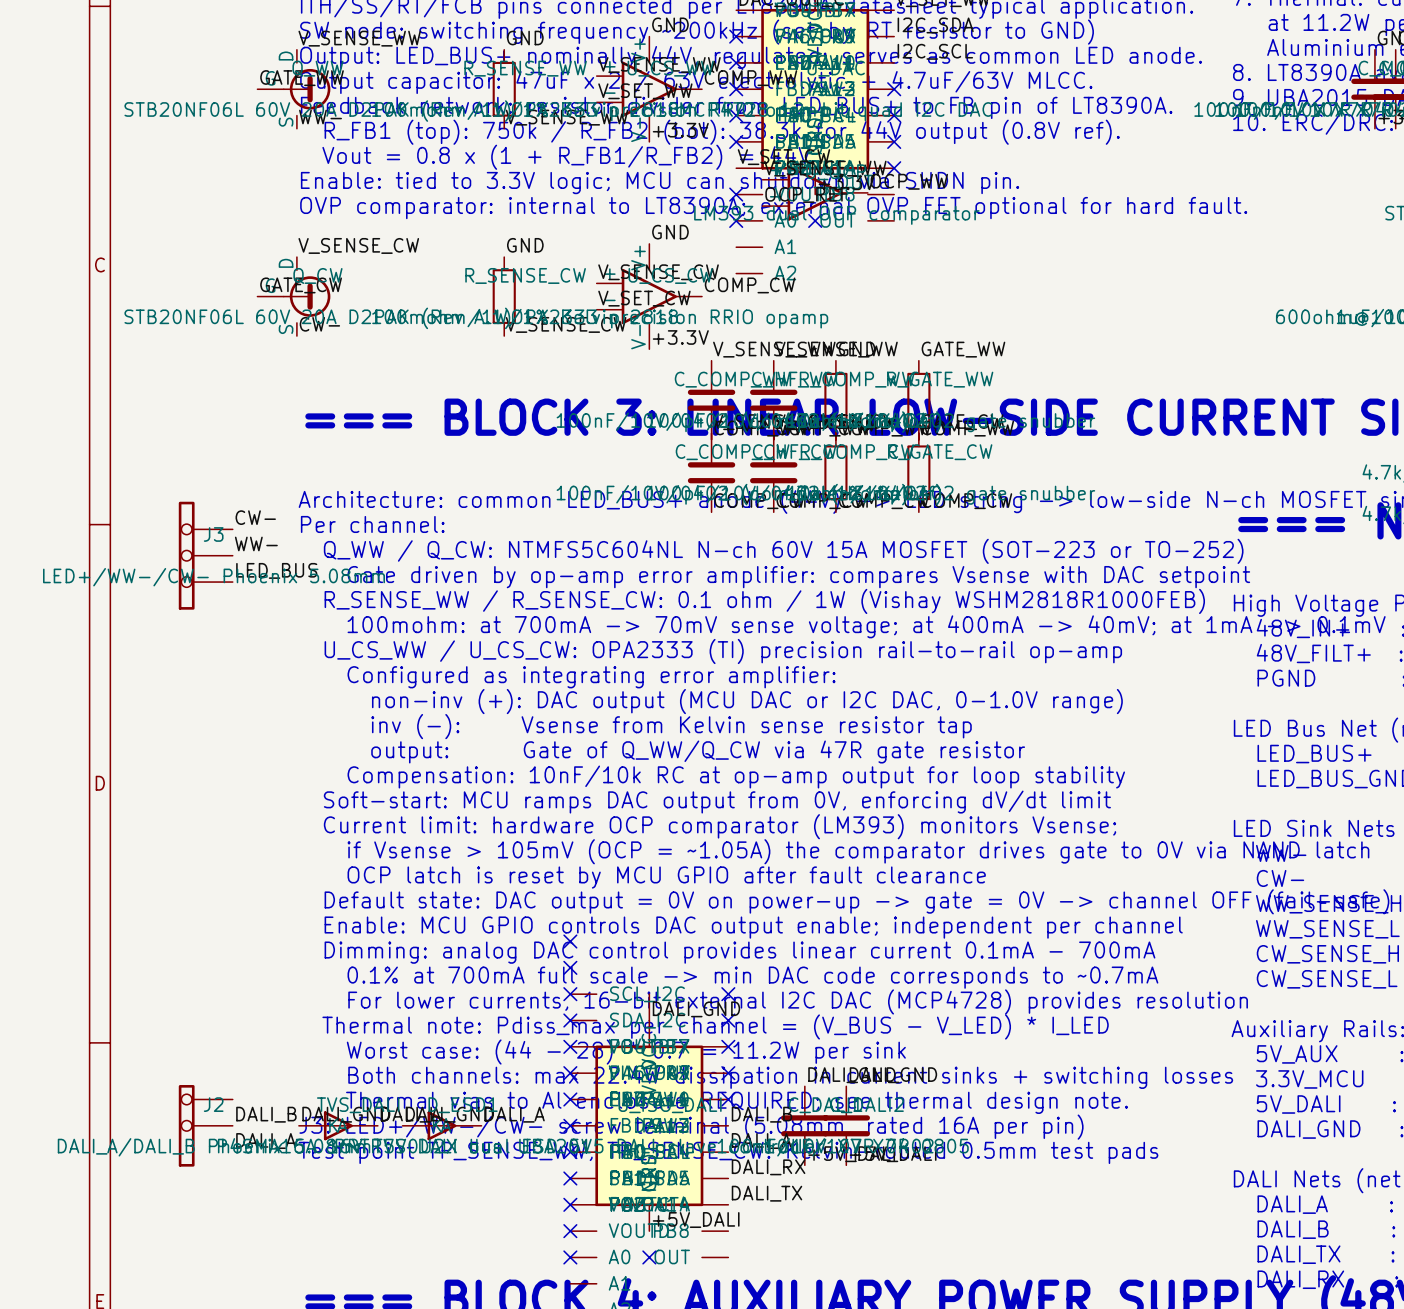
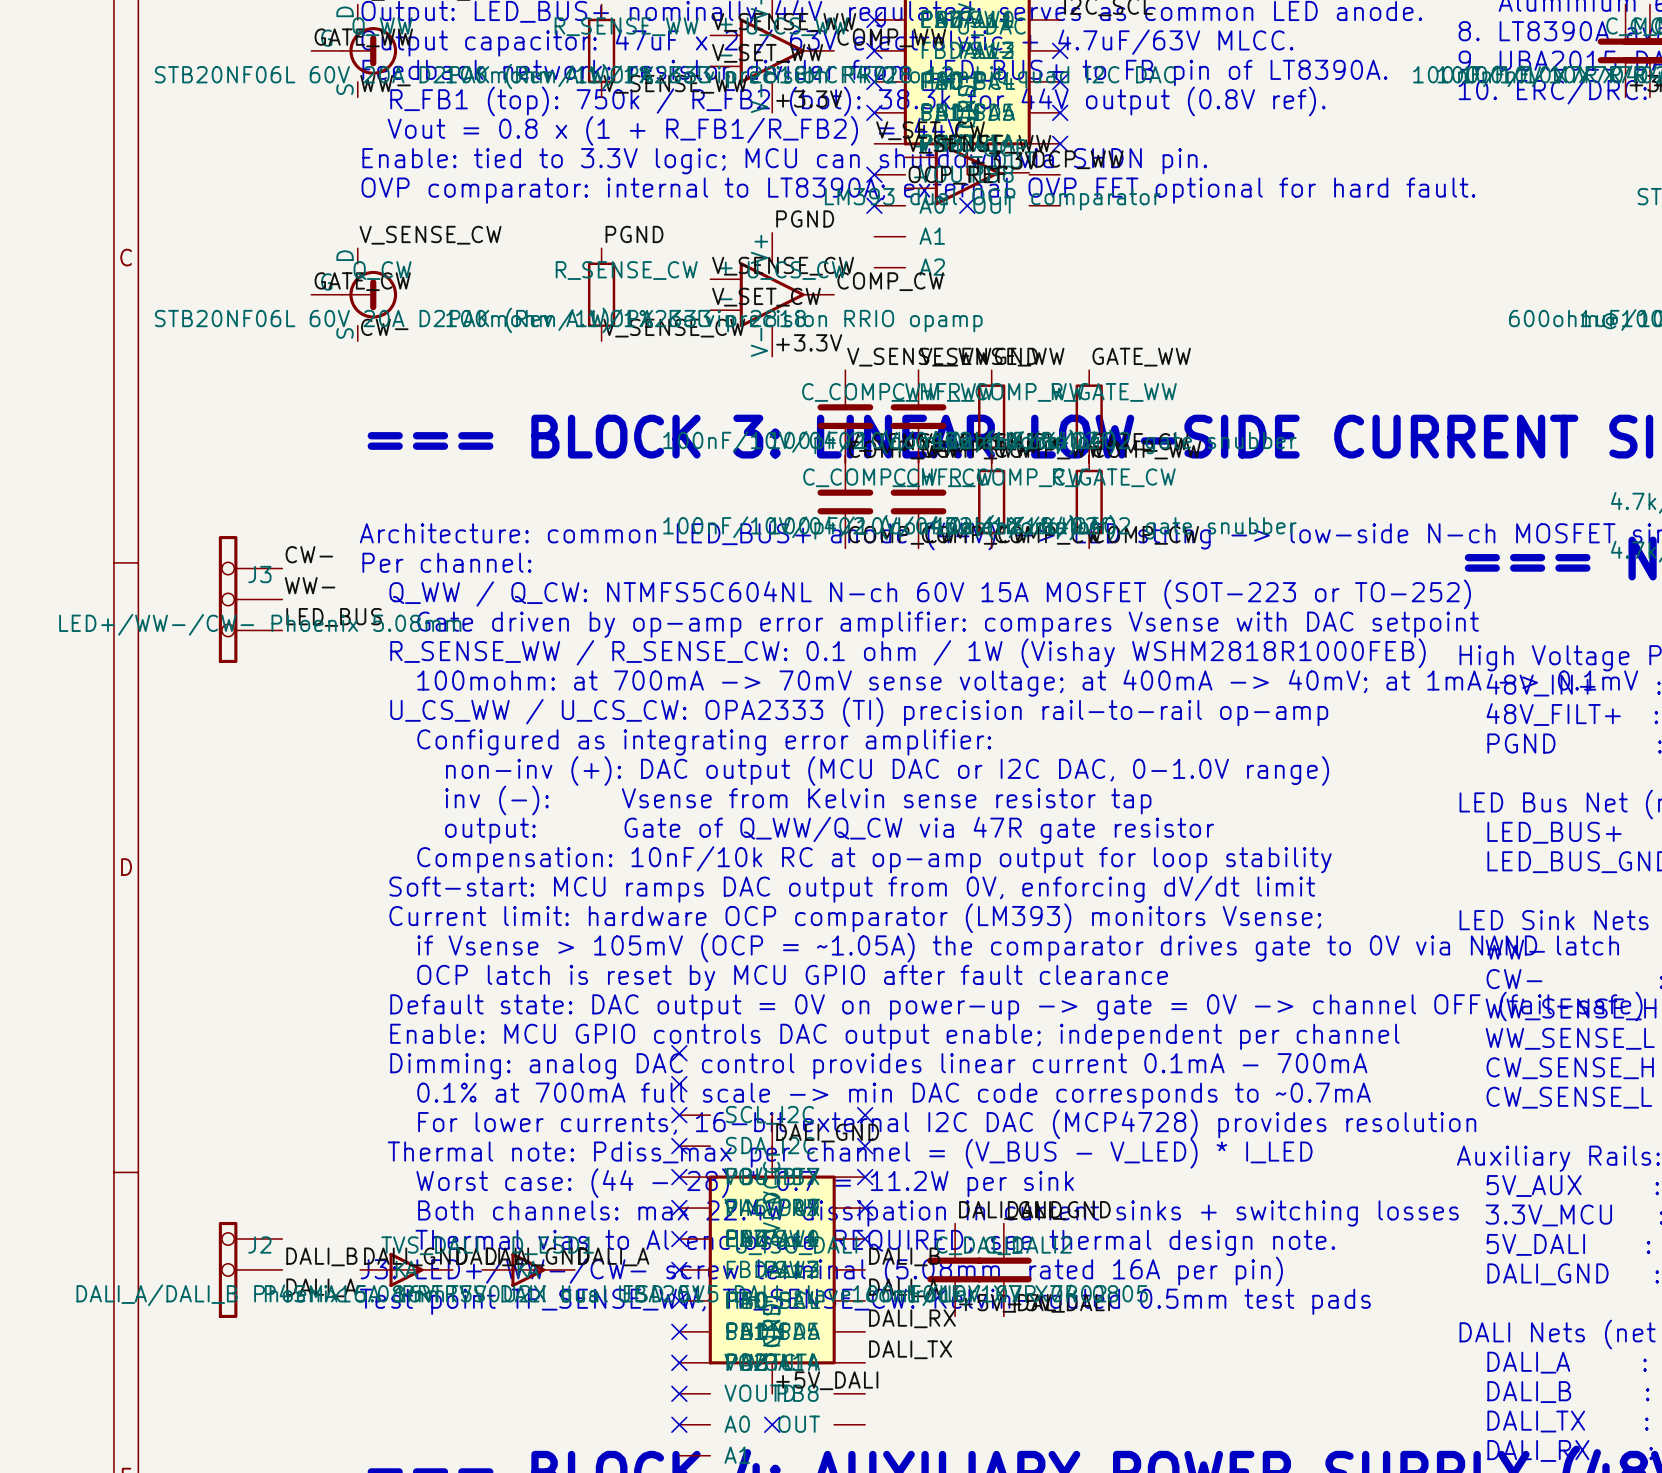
label: GND (670, 232) -> PGND (805, 218)
label: GND (525, 245) -> PGND (634, 234)

